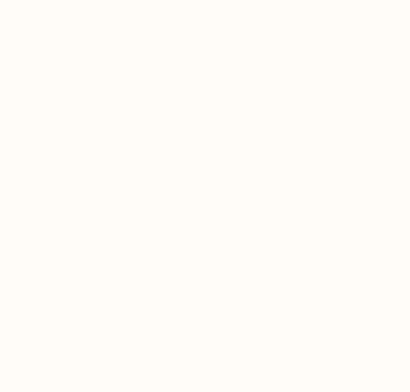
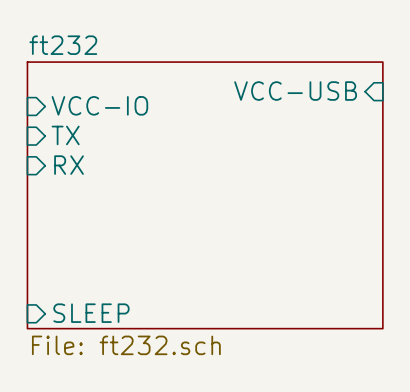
sheet pin: none -> VCC-USB (295, 91)
sheet pin: none -> VCC-IO (99, 105)
sheet pin: none -> TX (65, 135)
sheet pin: none -> RX (69, 165)
sheet ft232: none -> File: ft232.sch (205, 195)
sheet pin: none -> SLEEP (91, 313)

